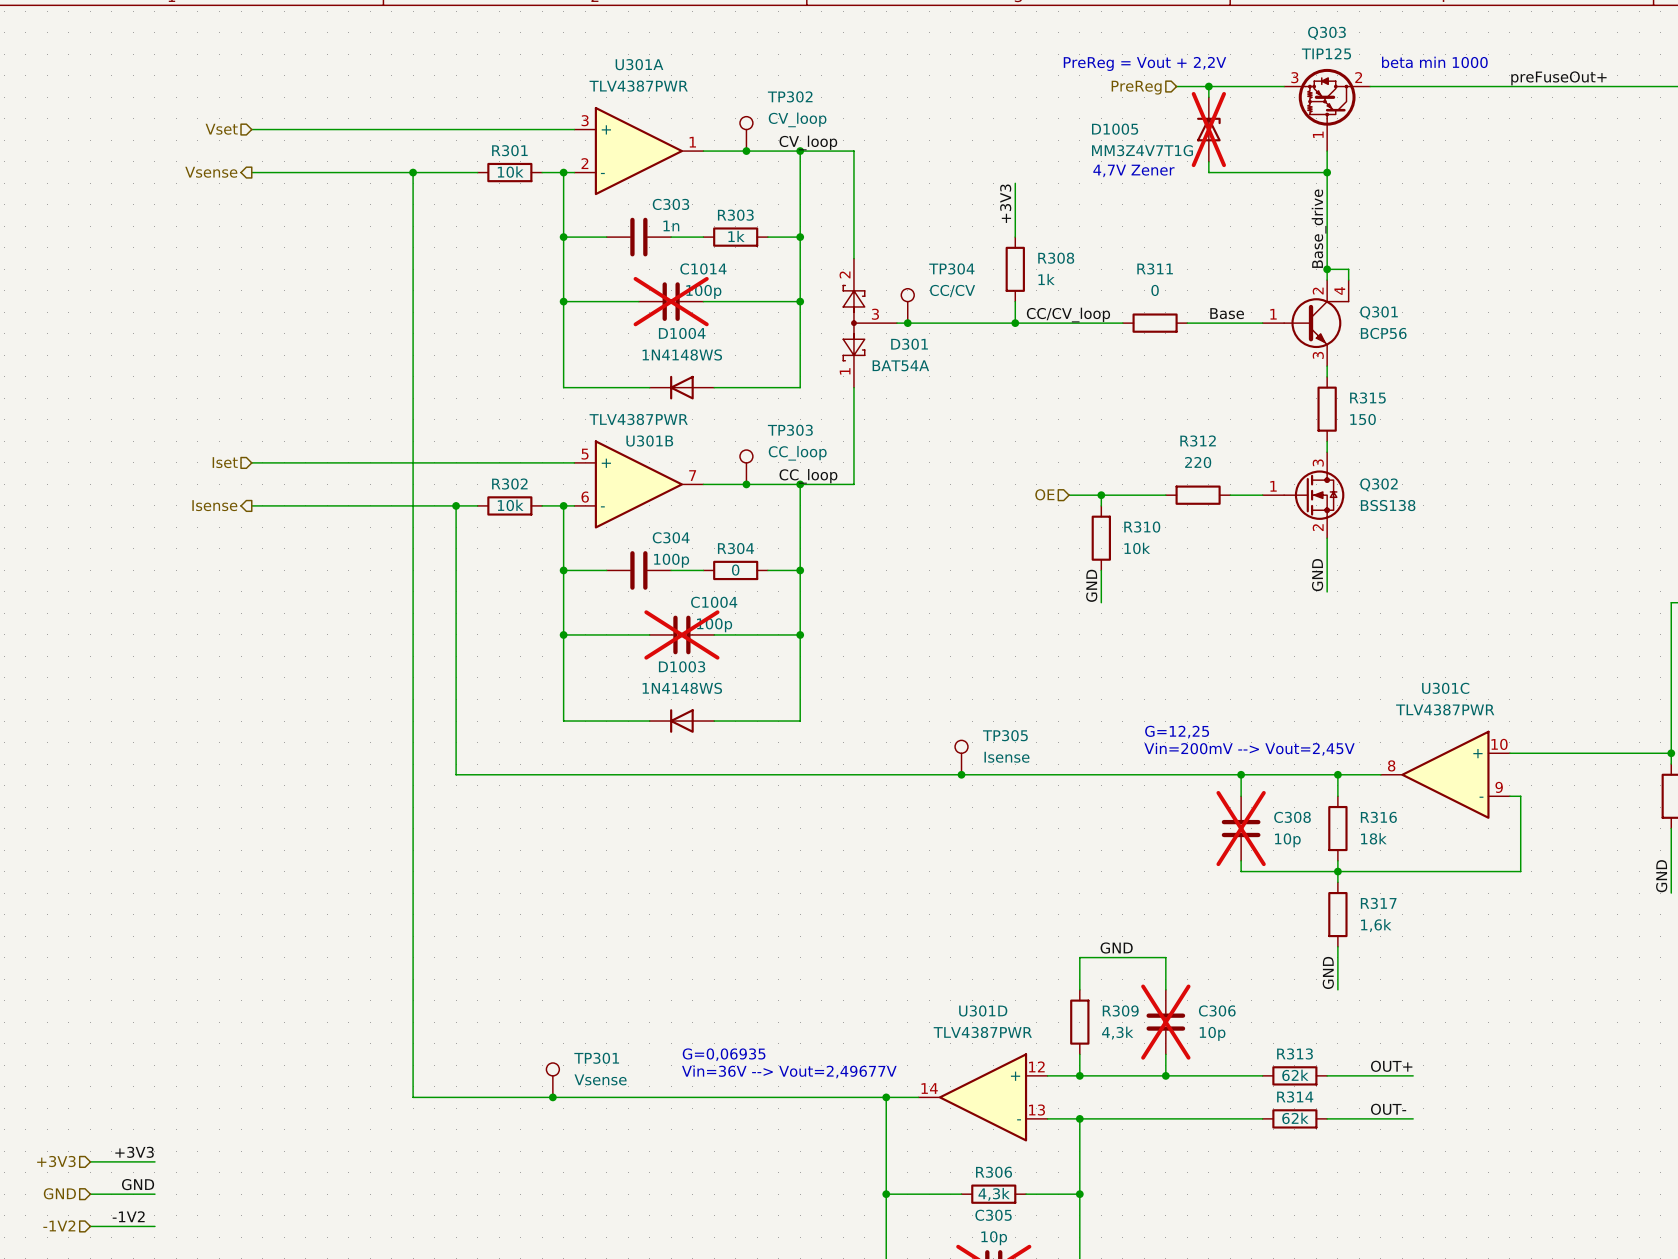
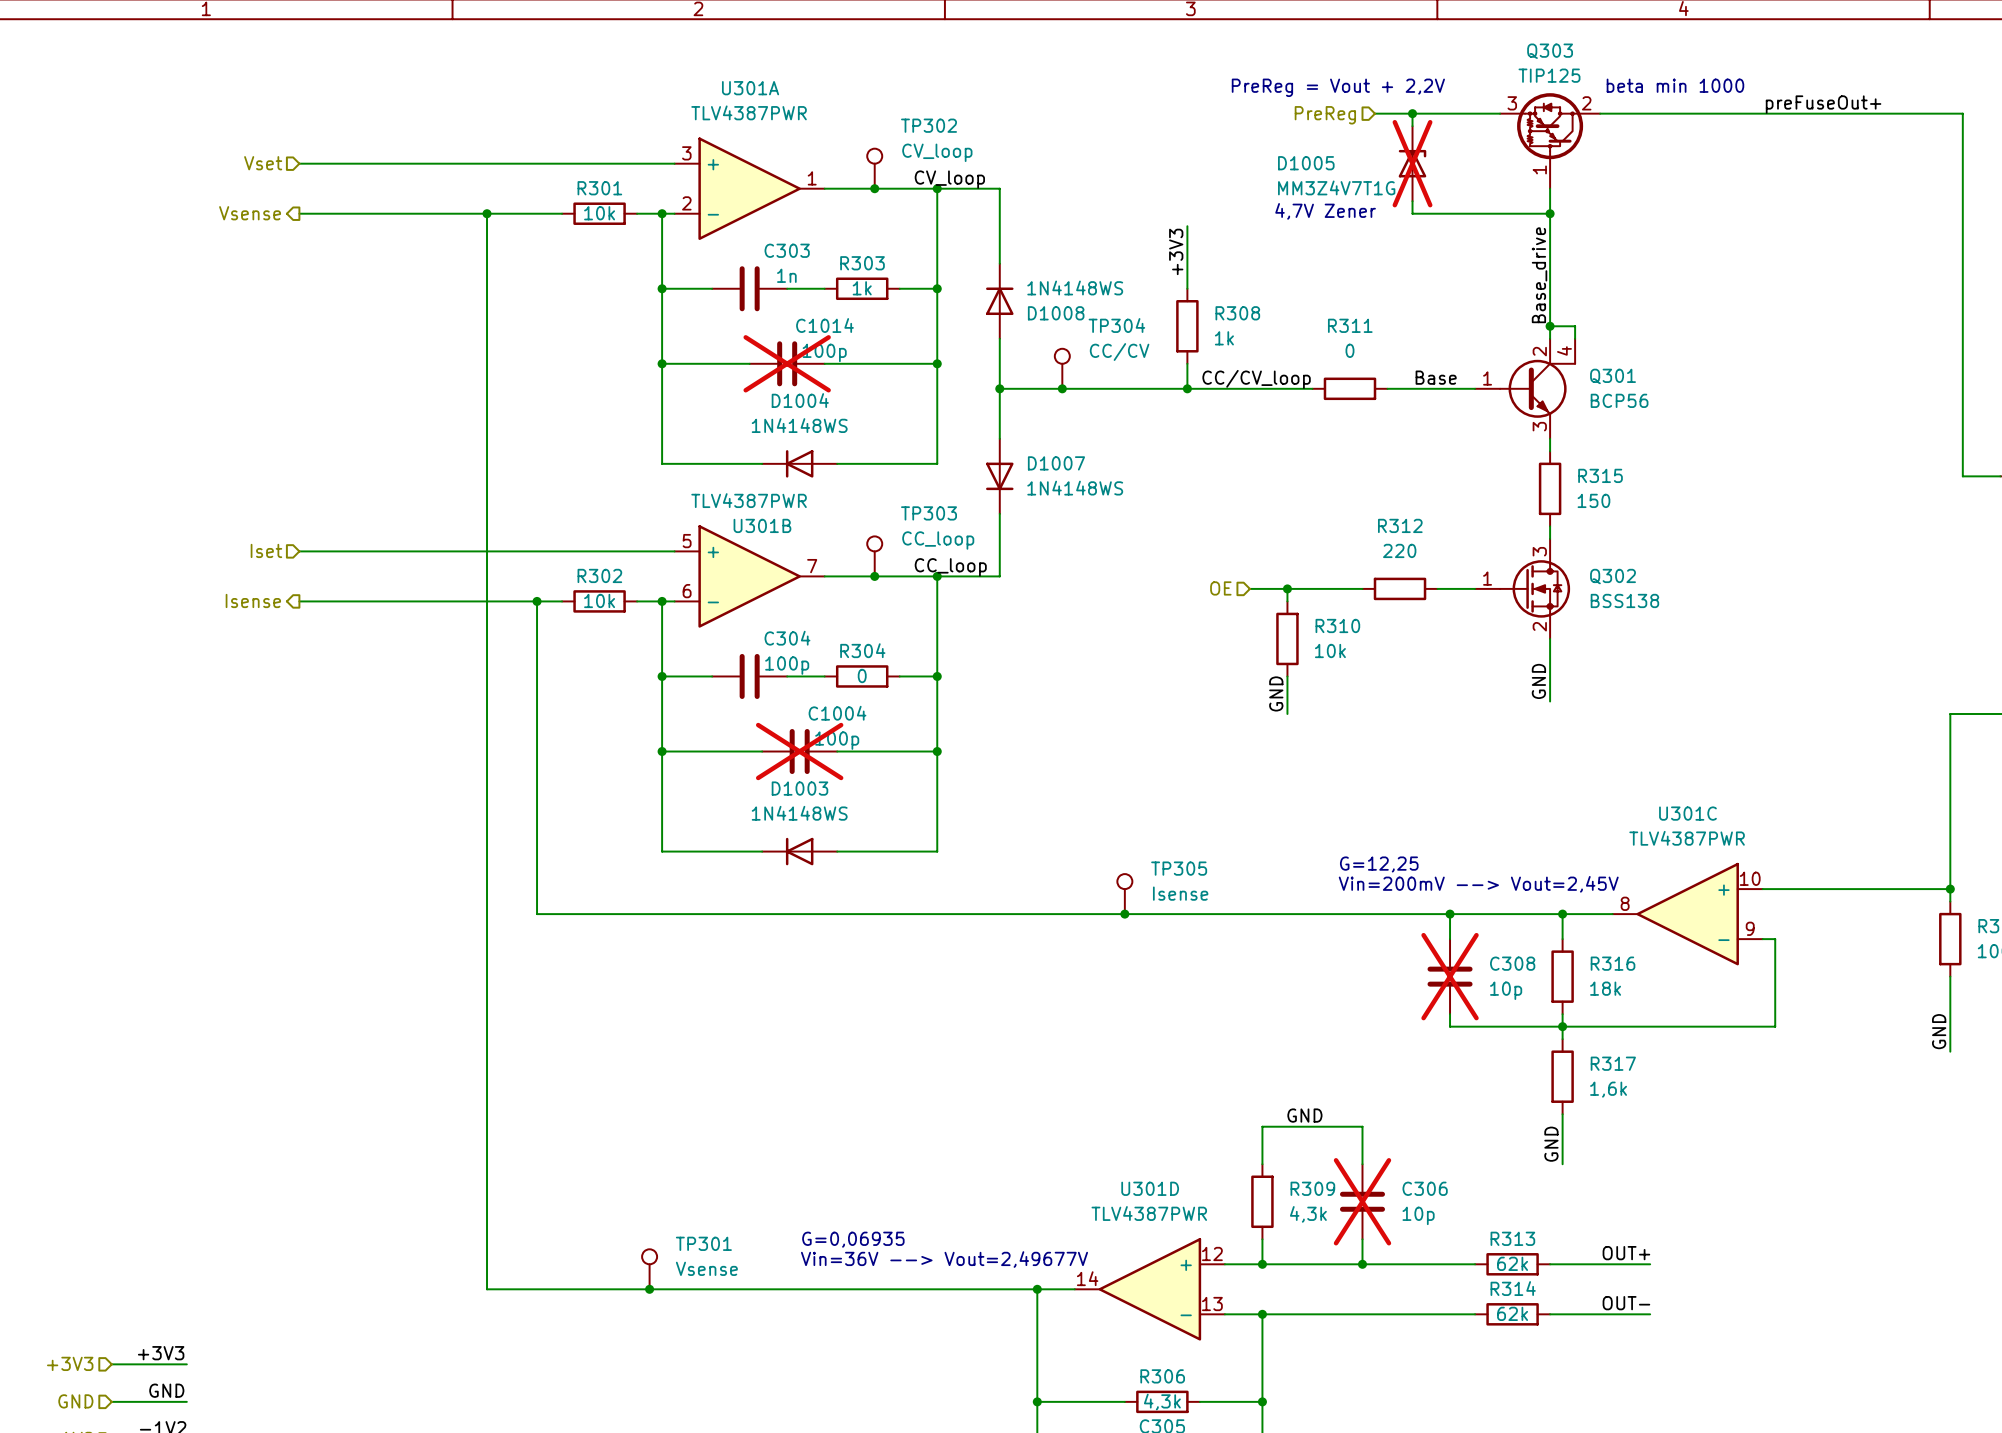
D1008: none -> 1N4148WS (999, 301)
junction: none -> (999, 388)
D301: BAT54A (870, 323) -> none
D1007: none -> 1N4148WS (999, 476)

